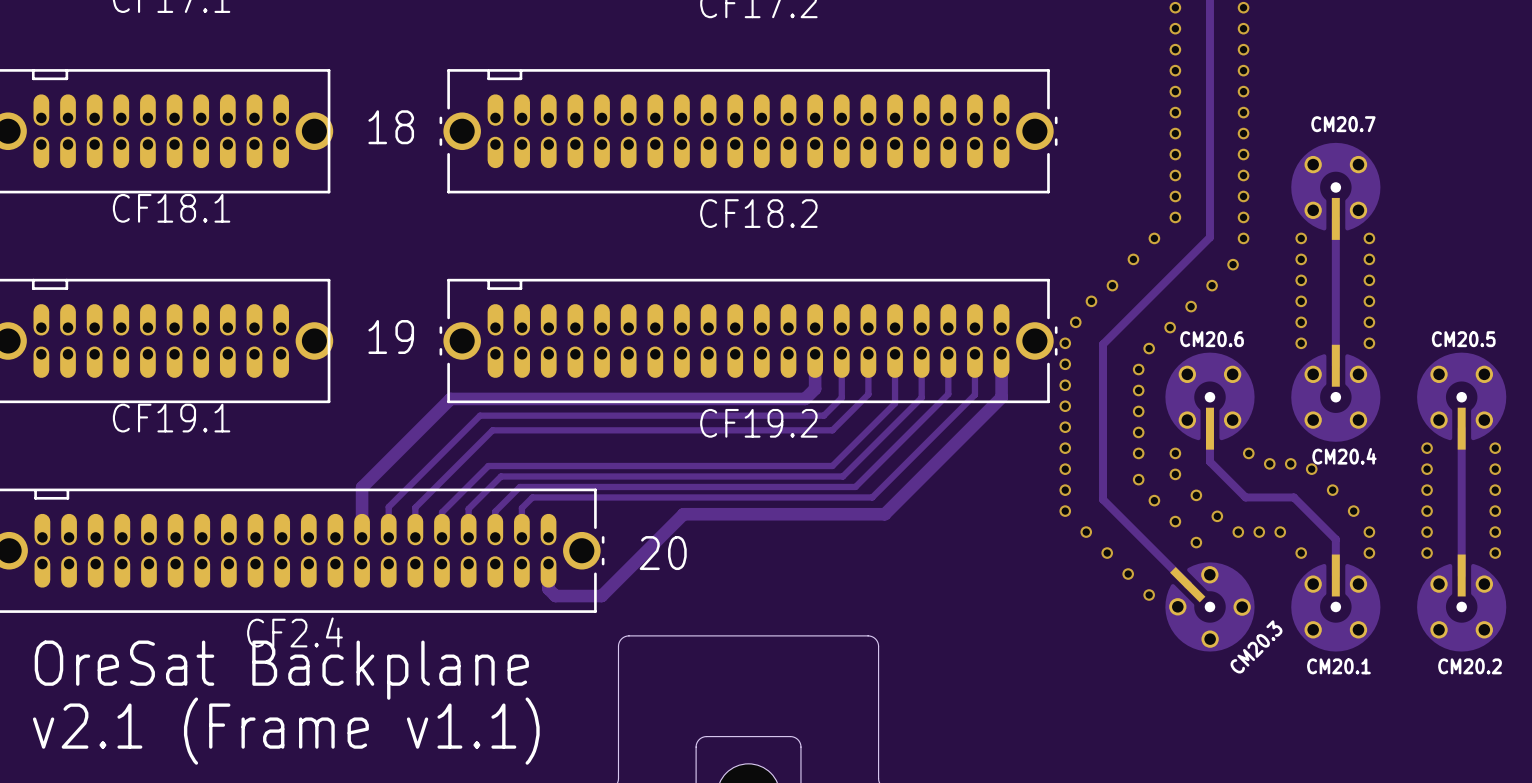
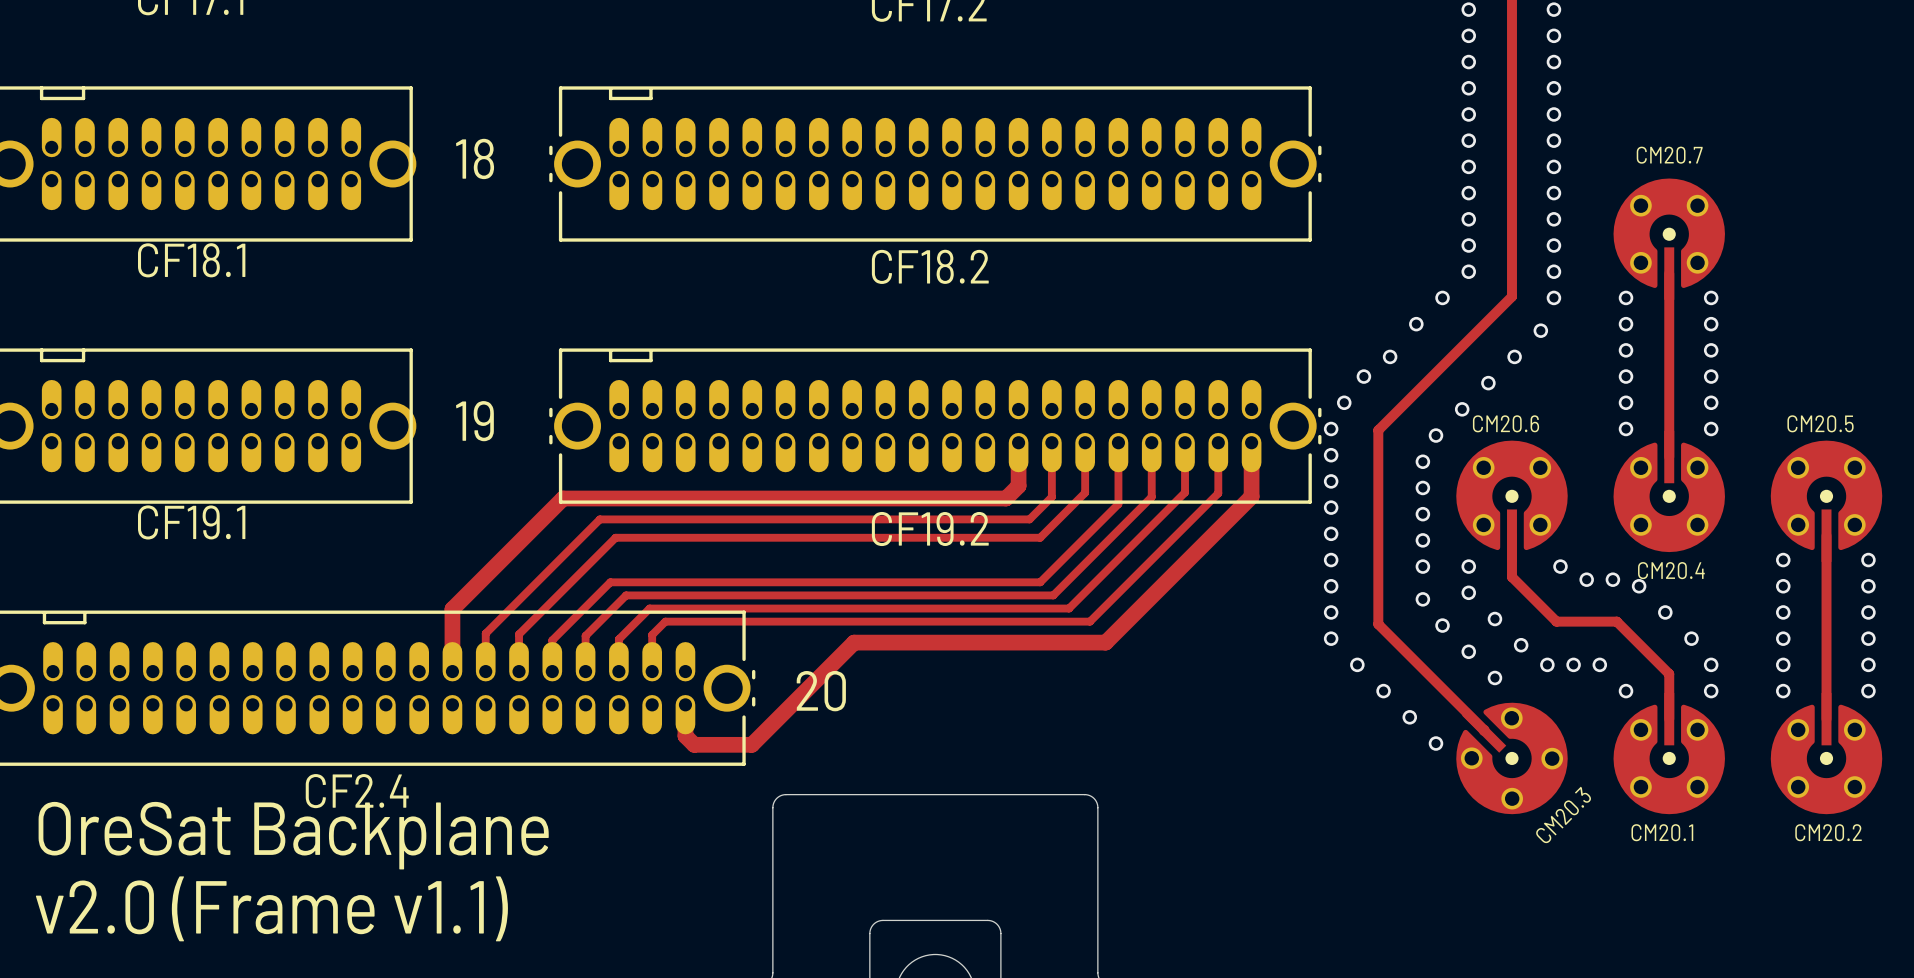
text: v2.1 (Frame v1.1) (286, 731) -> v2.0 (Frame v1.1) (271, 908)

